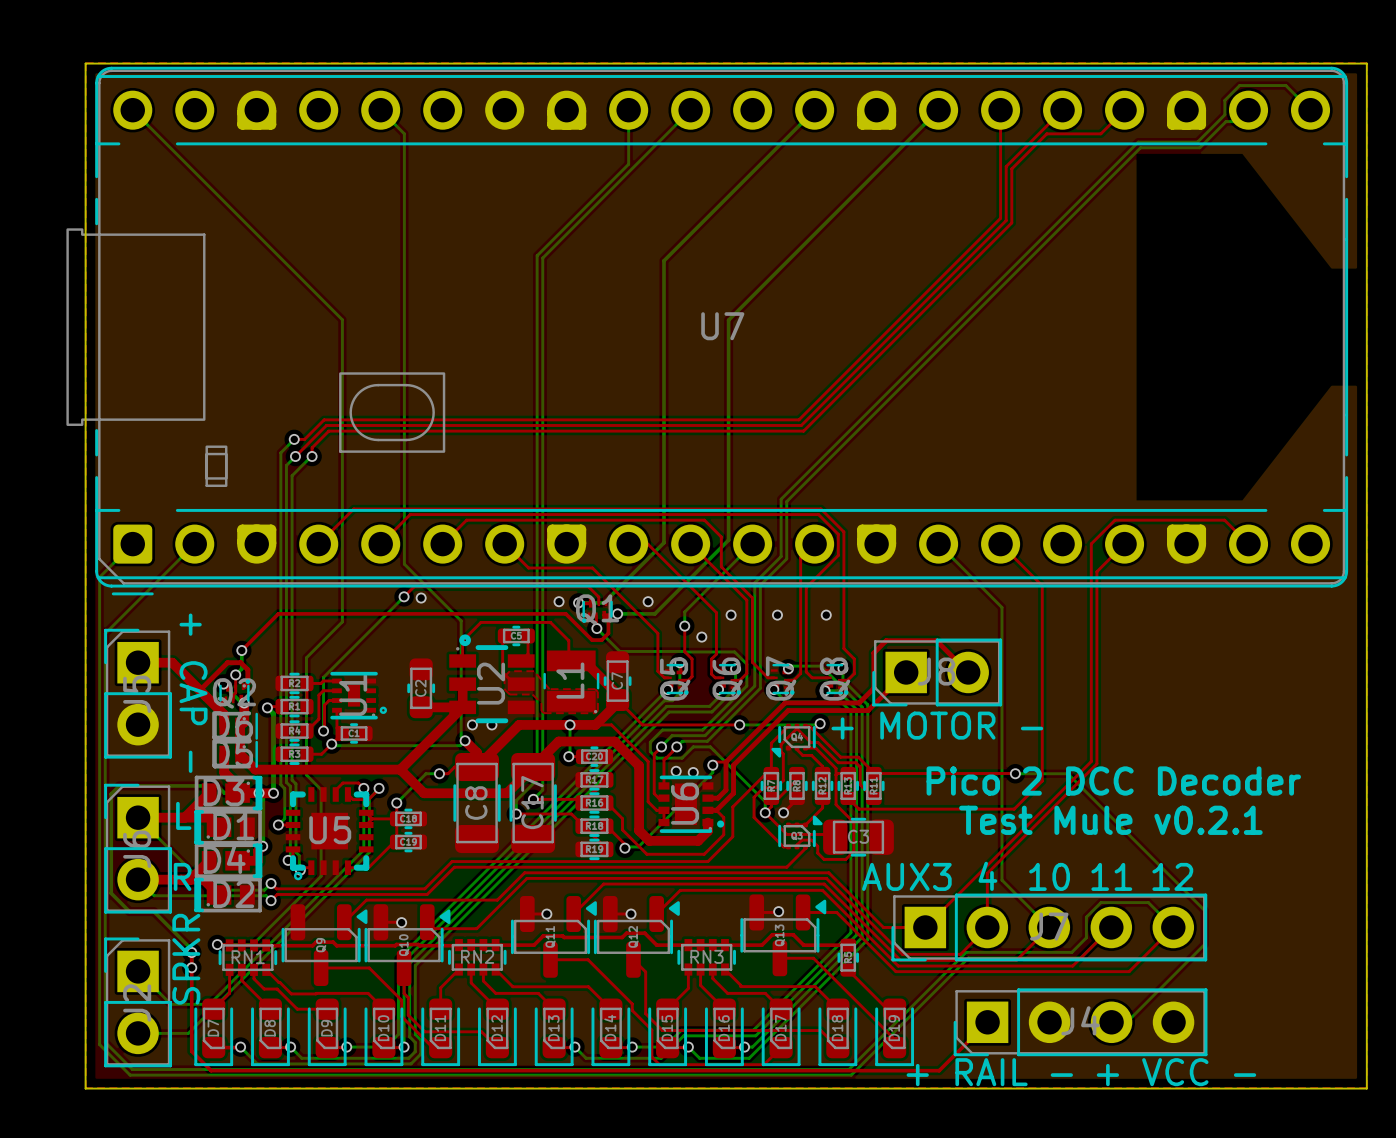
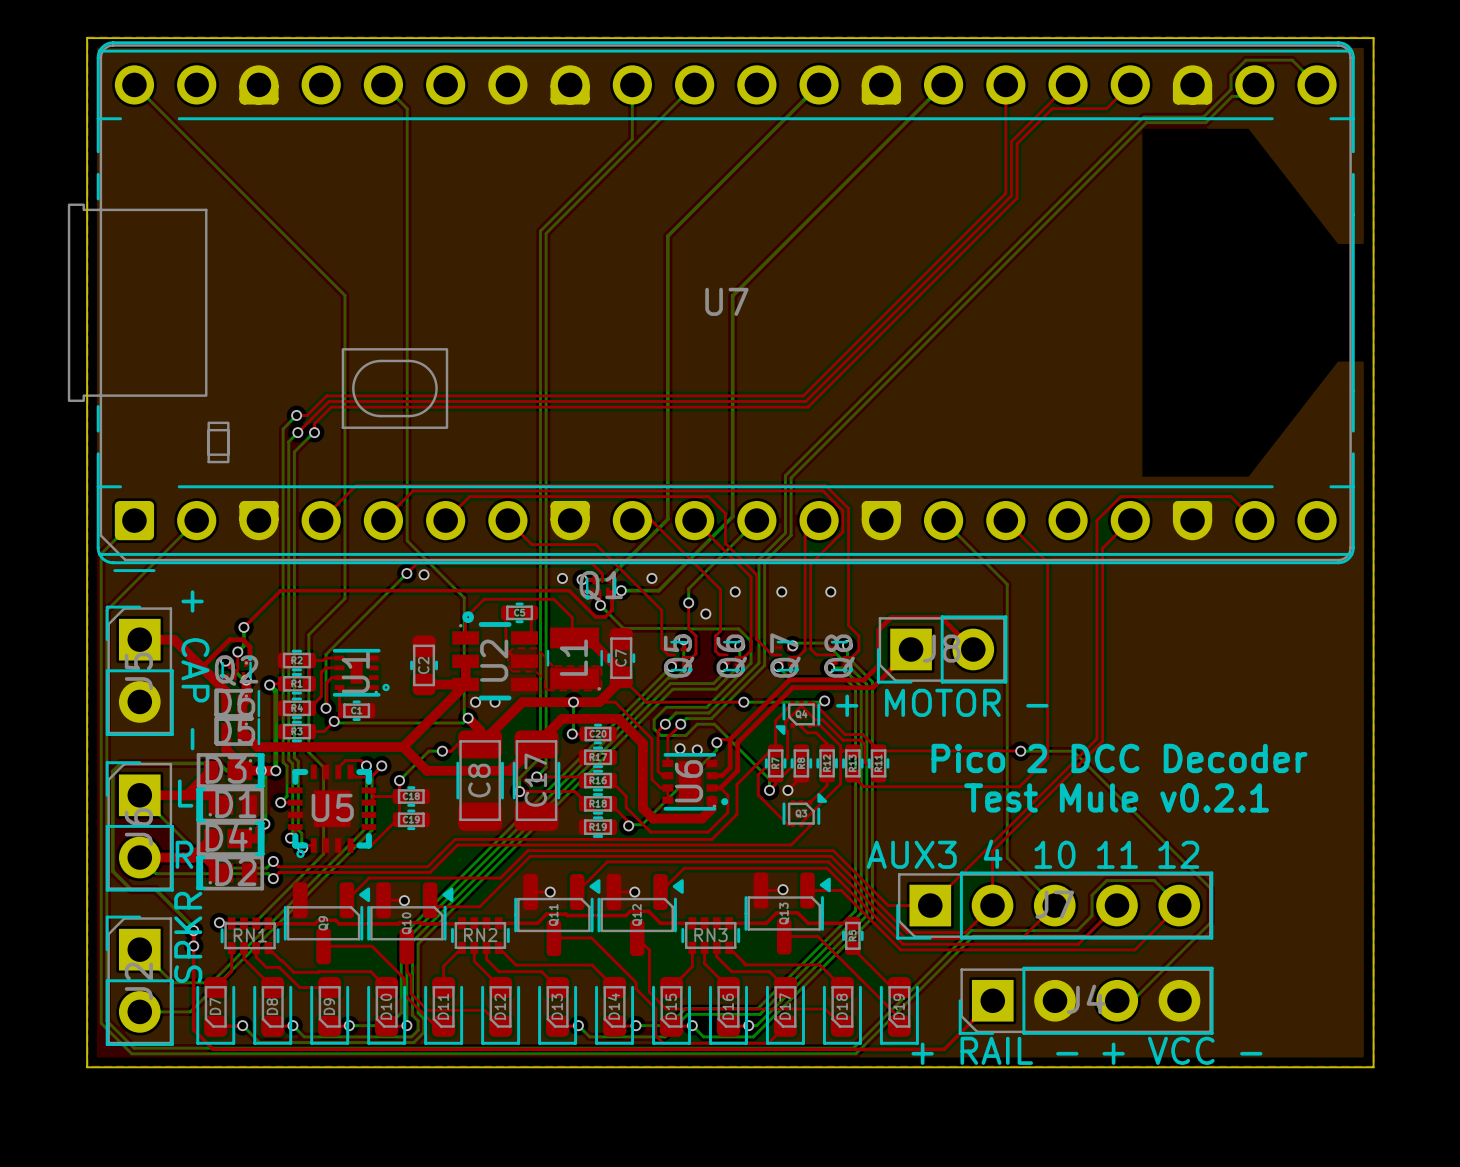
top track: (836, 804) (853, 822) (853, 851) (845, 859) (824, 859) (817, 853) (817, 846) (811, 840) (801, 840) (796, 846) -> (840, 782) (801, 823)
top track: (765, 812) (786, 834) (832, 834) (835, 837) -> none
C3: (858, 837) -> none

